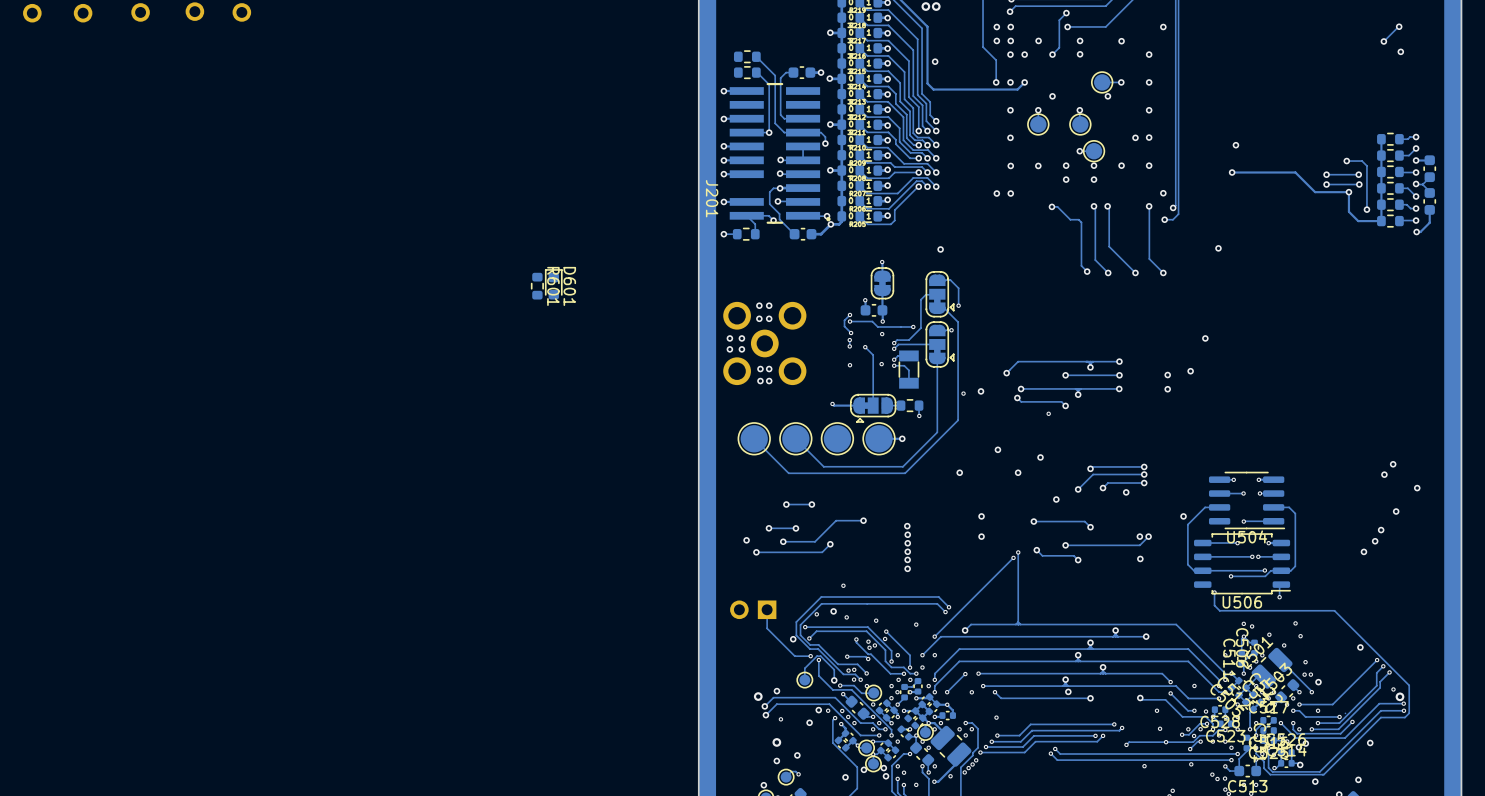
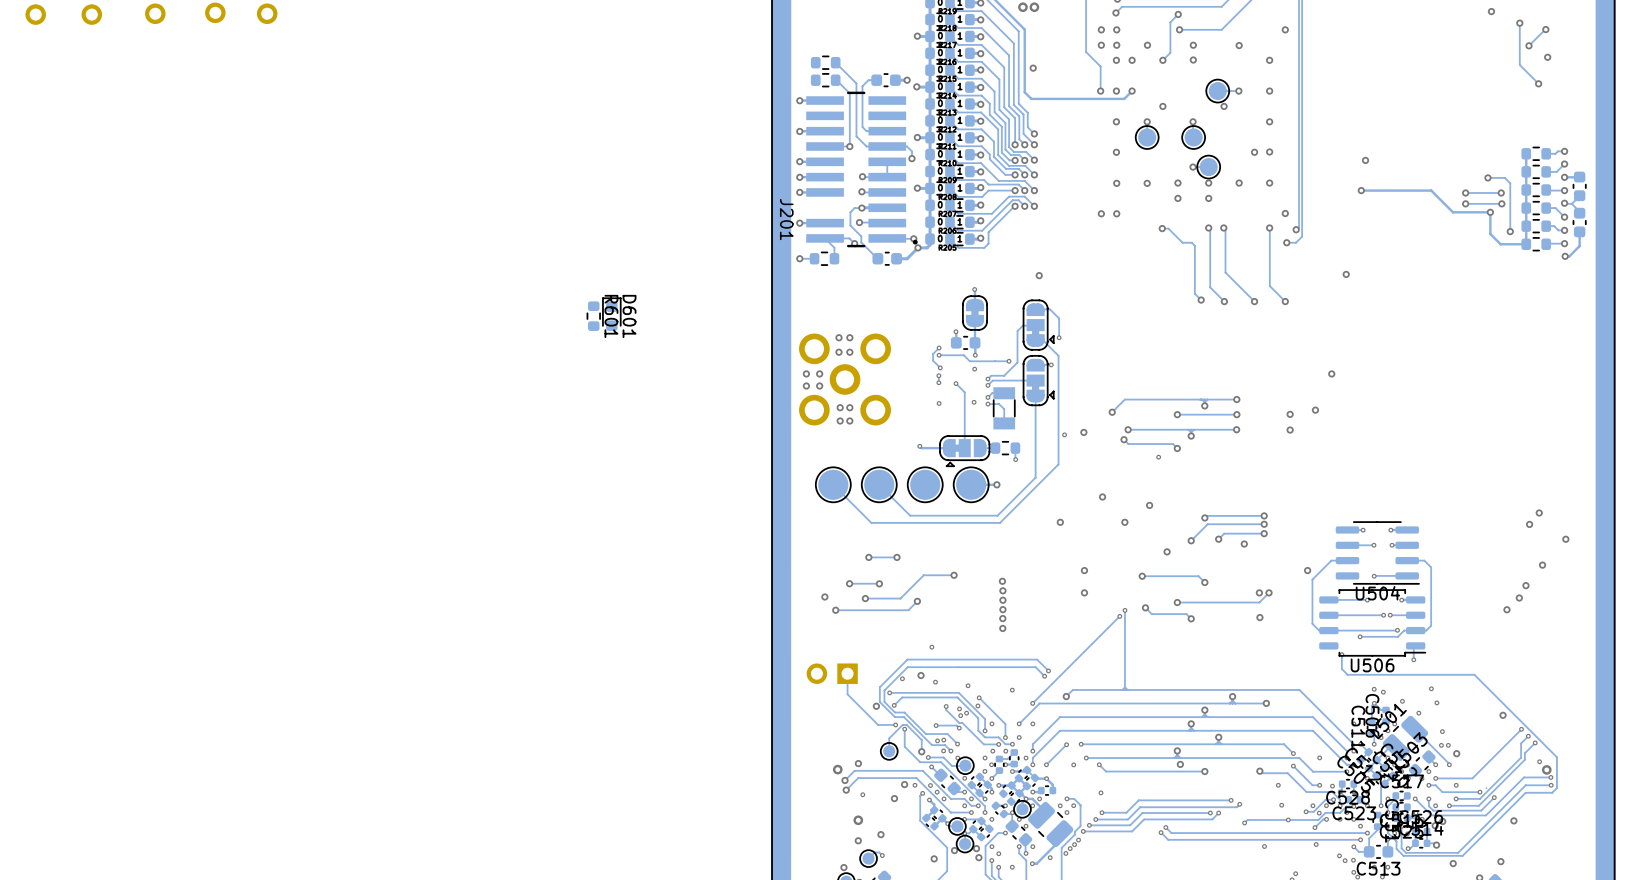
via: none -> (1491, 11)
track: none -> (1519, 23) (1519, 65) (1538, 83)
via: none -> (1519, 23)
via: none -> (1538, 83)

